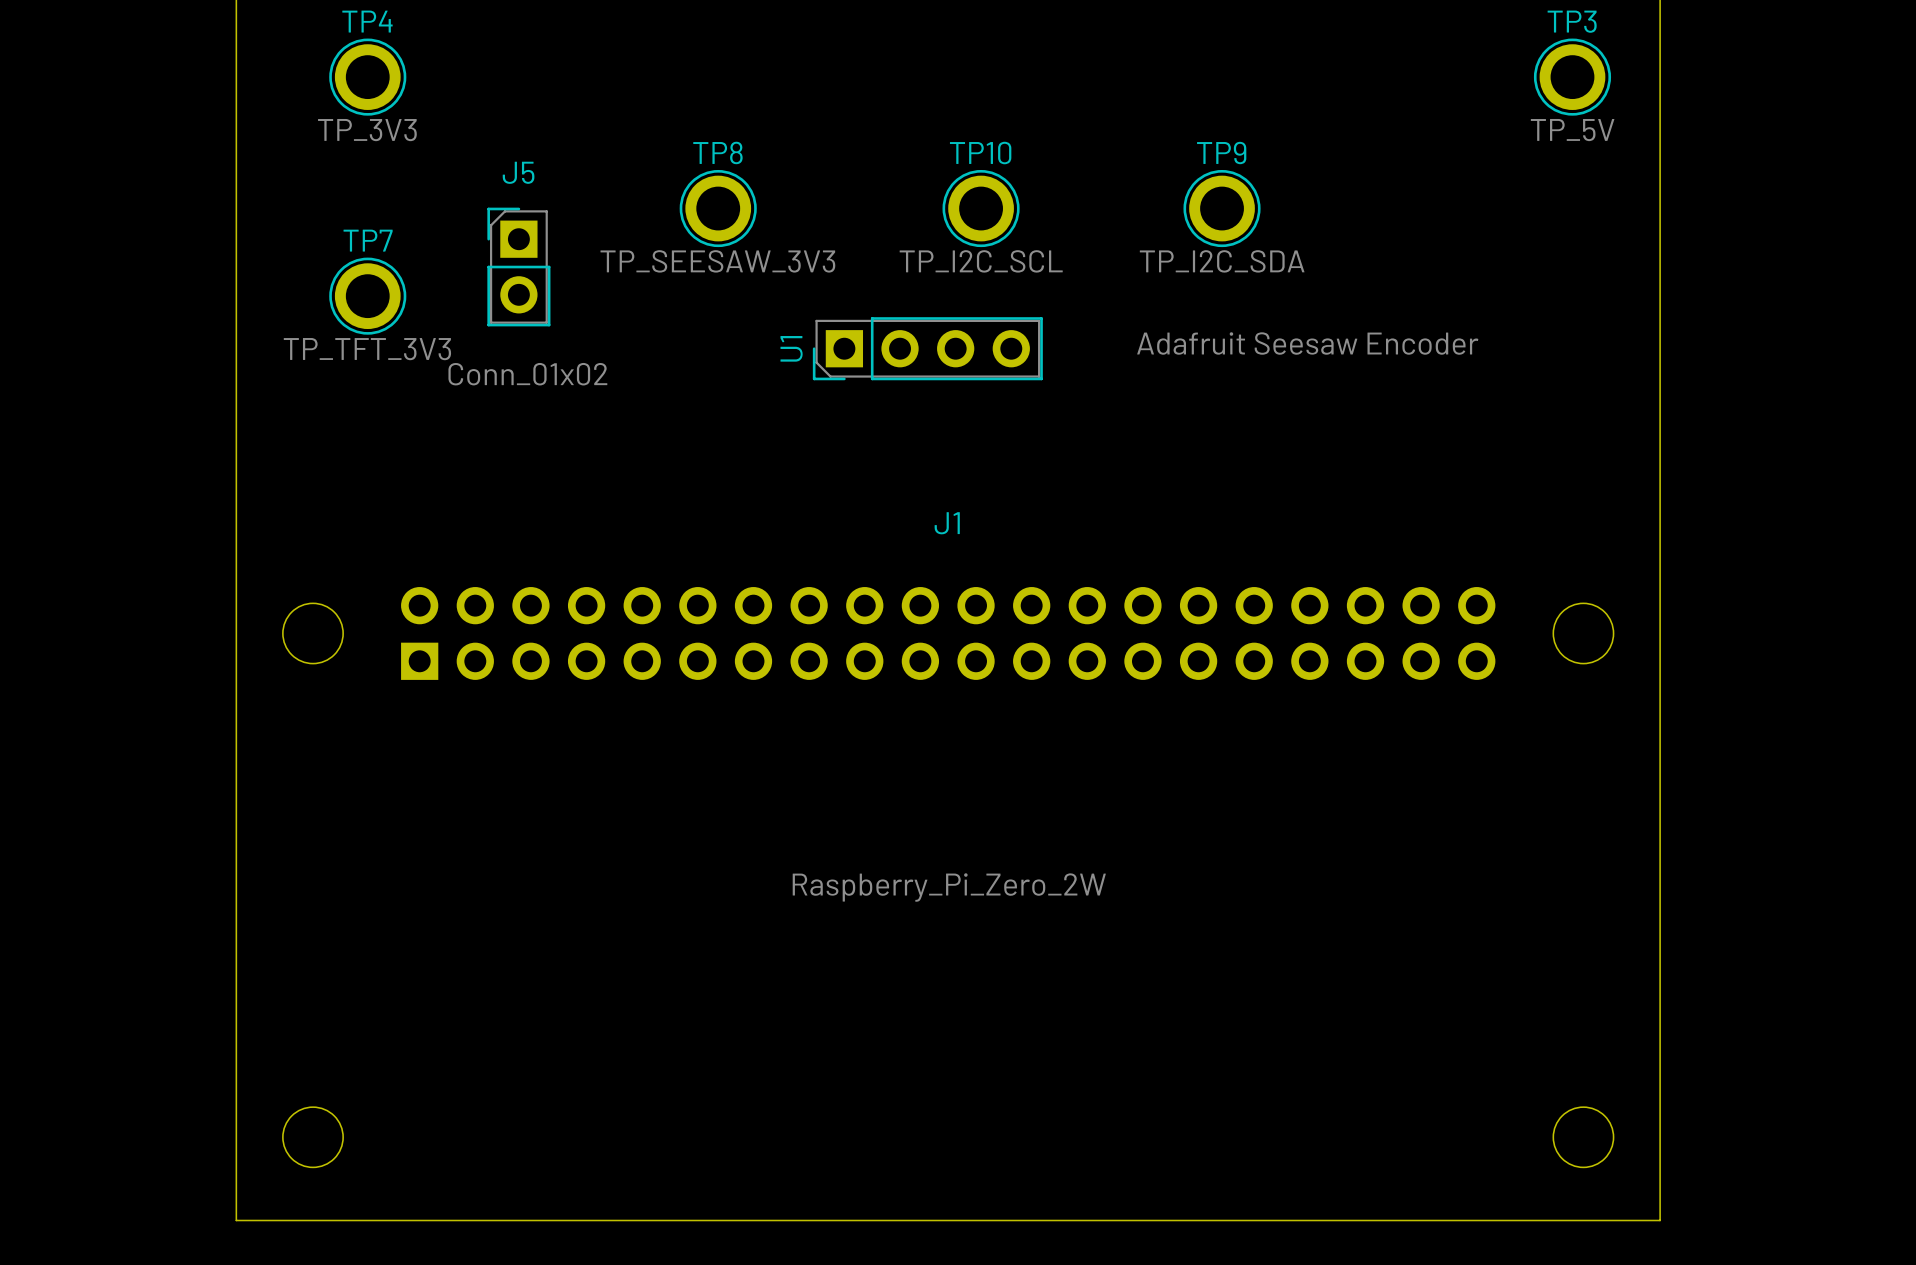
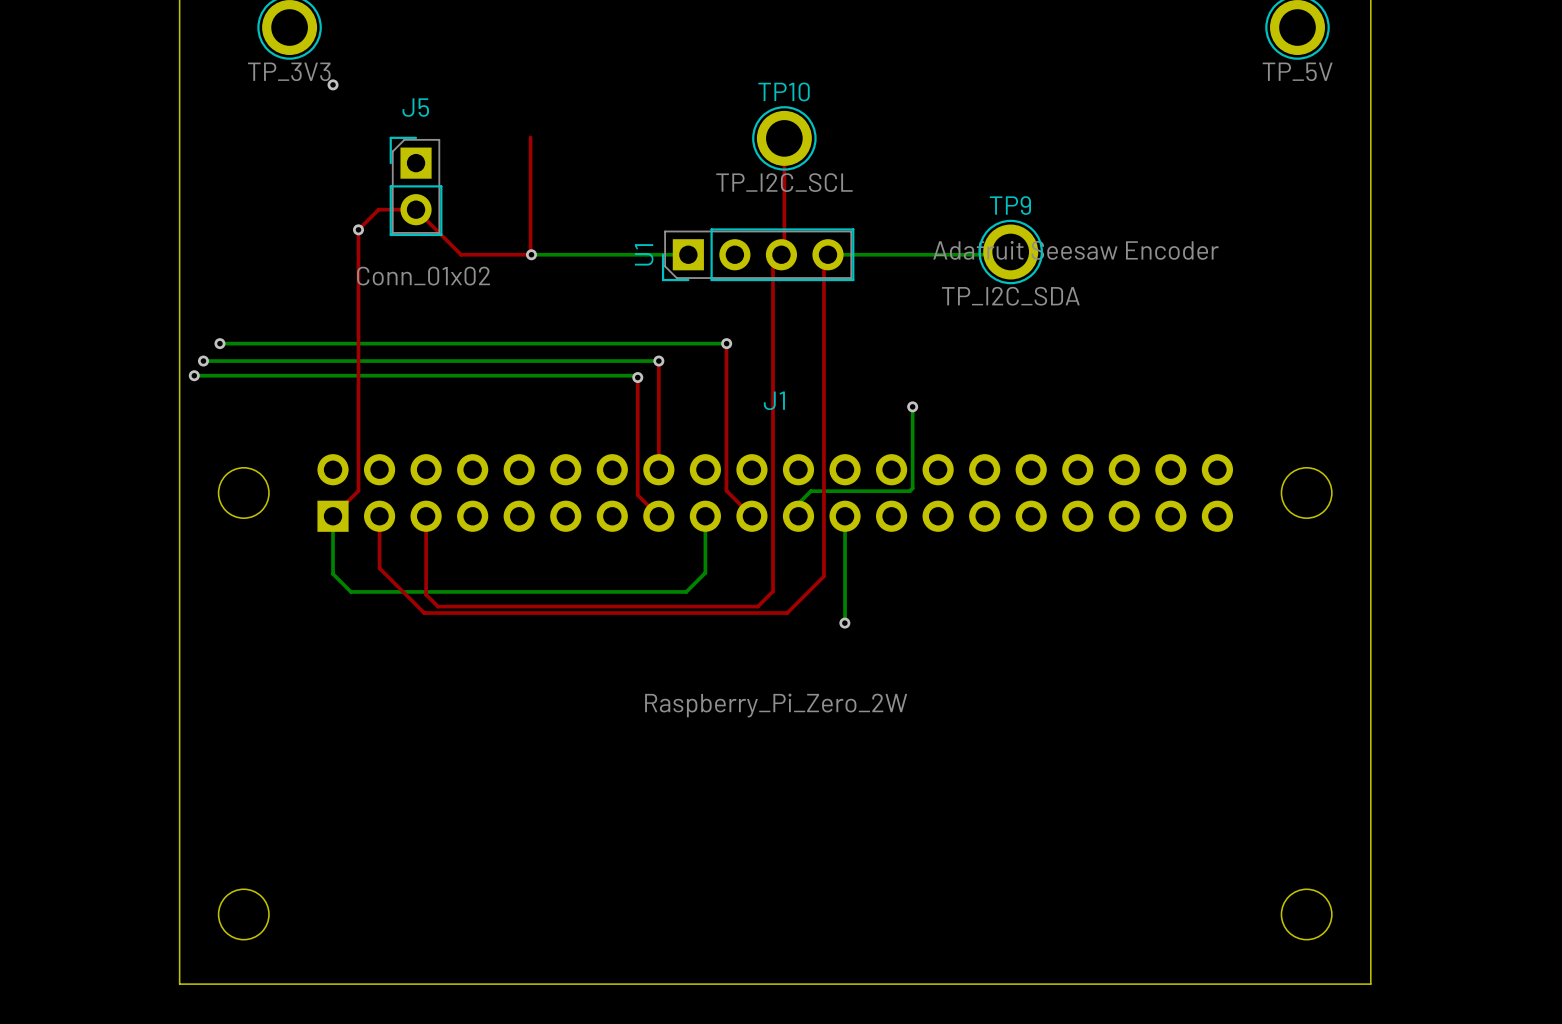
via: none -> (333, 84)
top track: none -> (530, 137) (531, 254) (461, 254) (416, 209) (378, 209) (358, 229) (358, 490) (333, 516)
TP8: TP_SEESAW_3V3 (718, 208) -> none
TP10 position: (981, 208) -> (784, 138)
TP9 position: (1222, 208) -> (1010, 252)
top track: none -> (784, 138) (784, 251) (773, 263) (773, 591) (757, 606) (438, 606) (426, 594) (426, 516)
TP7: TP_TFT_3V3 (367, 296) -> none
via: none -> (358, 229)
bottom track: none -> (1010, 252) (1007, 254) (827, 254)
bottom track: none -> (531, 254) (688, 254)
via: none -> (531, 254)
top track: none -> (827, 254) (823, 258) (823, 576) (787, 613) (424, 613) (379, 568) (379, 516)
bottom track: none -> (219, 343) (726, 343)
via: none -> (219, 343)
via: none -> (726, 343)
top track: none -> (726, 348) (726, 490) (751, 516)
bottom track: none -> (203, 361) (658, 361)
via: none -> (203, 361)
top track: none -> (658, 361) (658, 469)
via: none -> (658, 361)
bottom track: none -> (194, 375) (635, 375) (637, 377)
via: none -> (194, 375)
top track: none -> (637, 377) (637, 495) (658, 516)
via: none -> (637, 377)
bottom track: none -> (911, 406) (912, 488) (909, 491) (810, 491) (798, 503)
via: none -> (912, 406)
bottom track: none -> (333, 516) (333, 573) (350, 591) (686, 591) (705, 572) (705, 516)
bottom track: none -> (845, 516) (845, 622)
via: none -> (844, 623)

